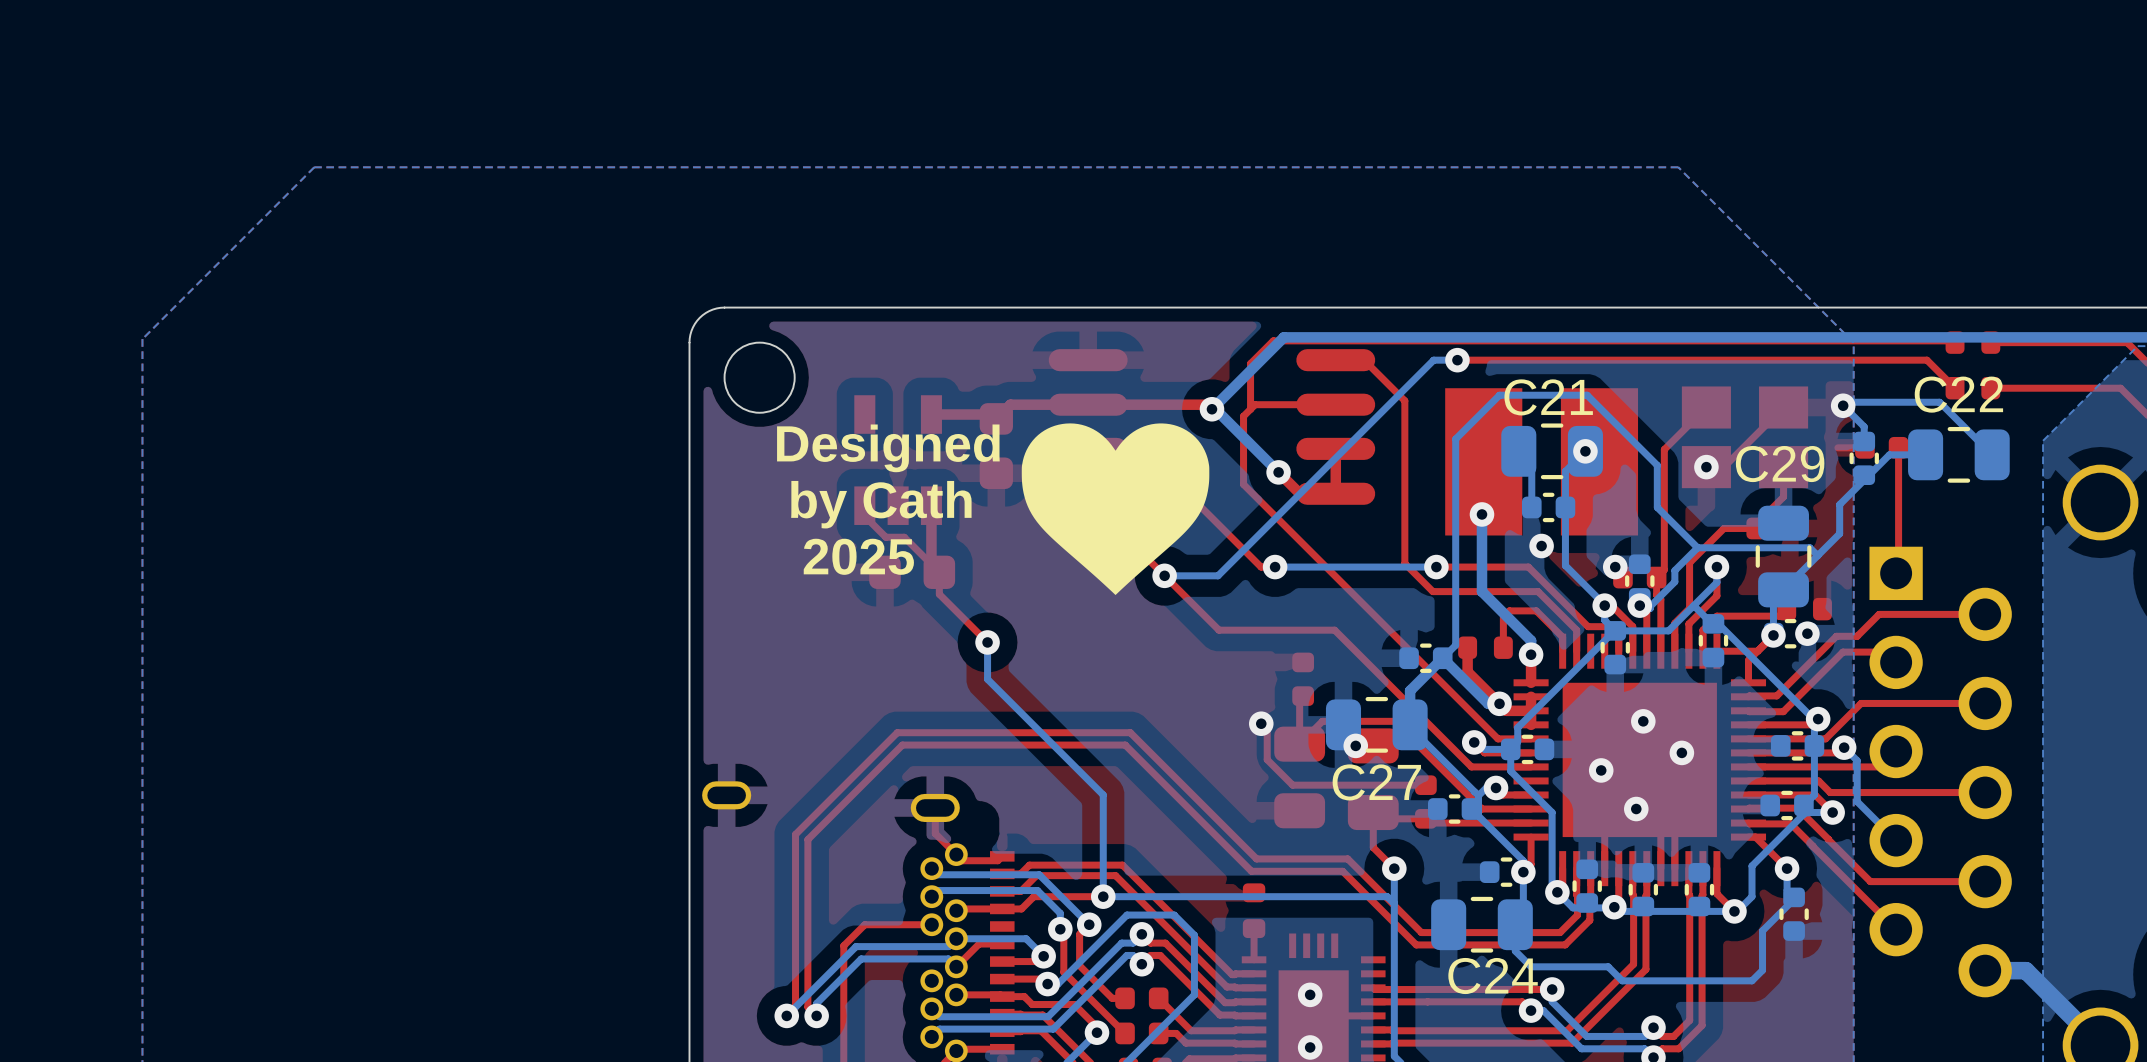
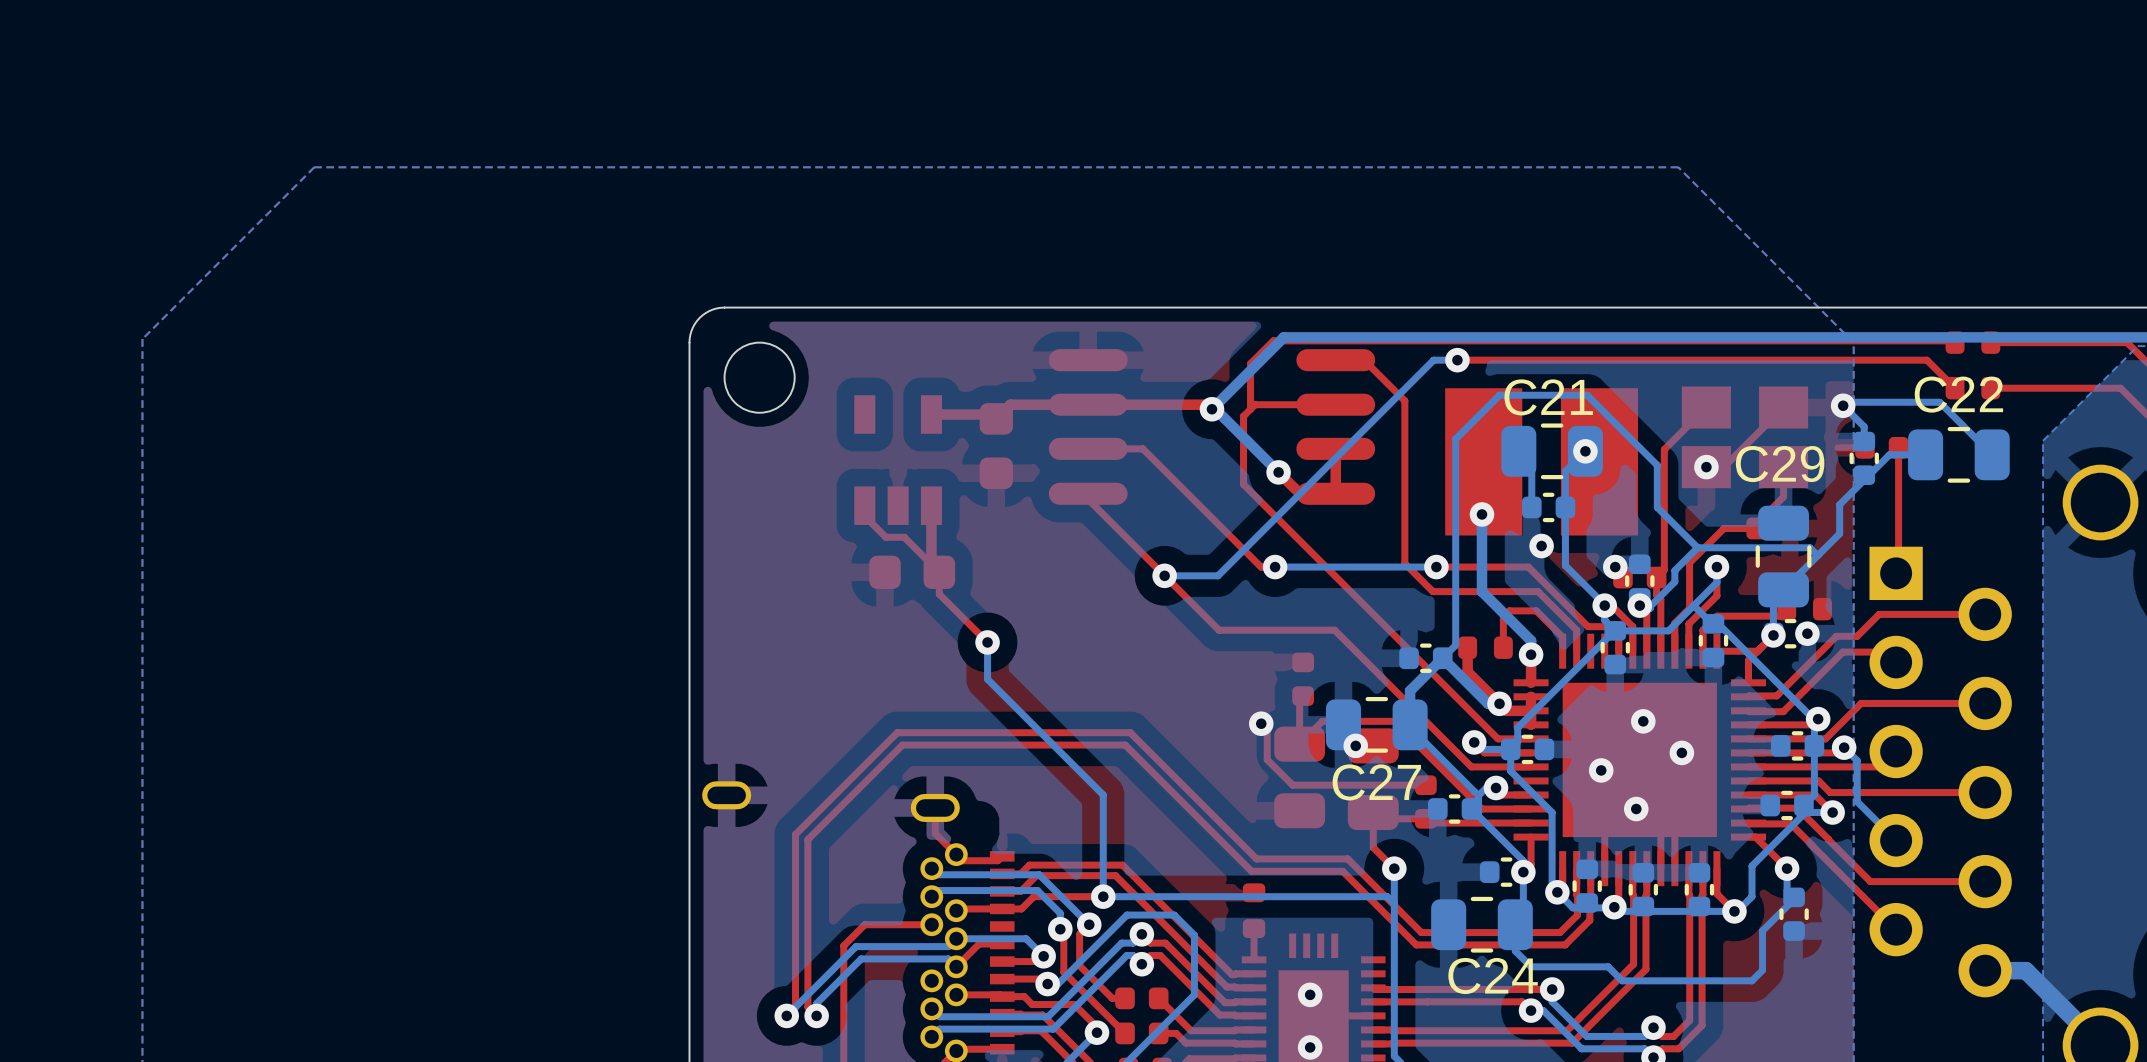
drawing: [1021, 423, 1210, 596] -> none
text: Designed (888, 448) -> none
text: by Cath (881, 504) -> none
text: 2025 (858, 556) -> none

